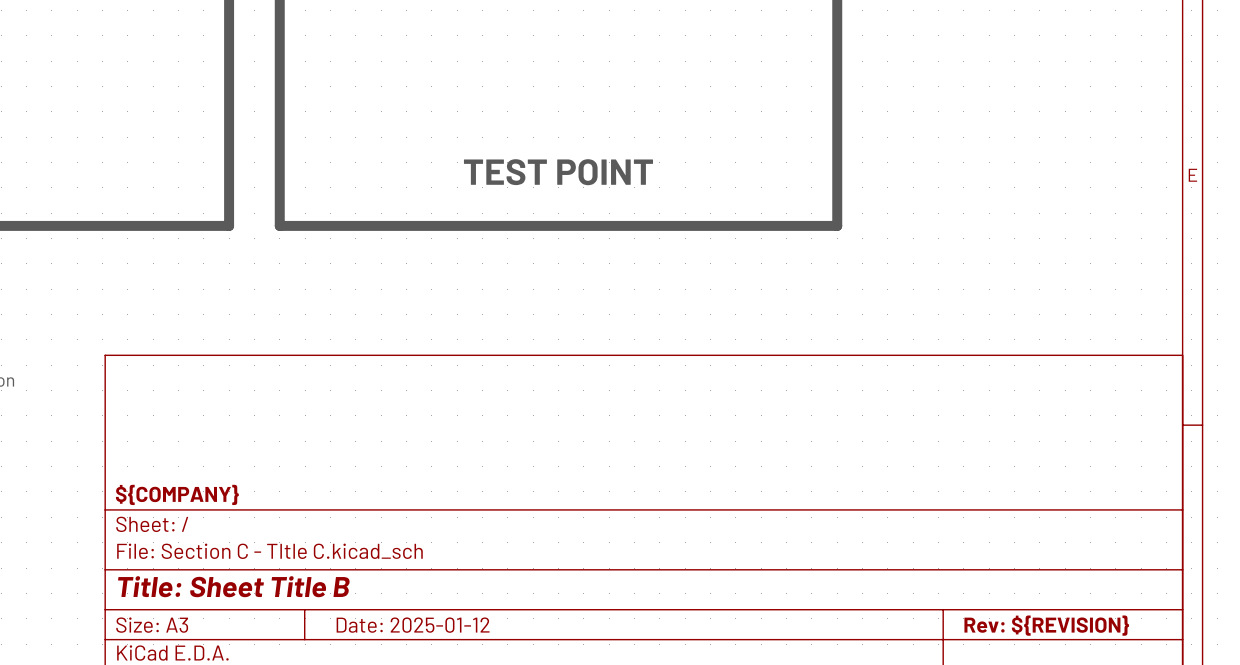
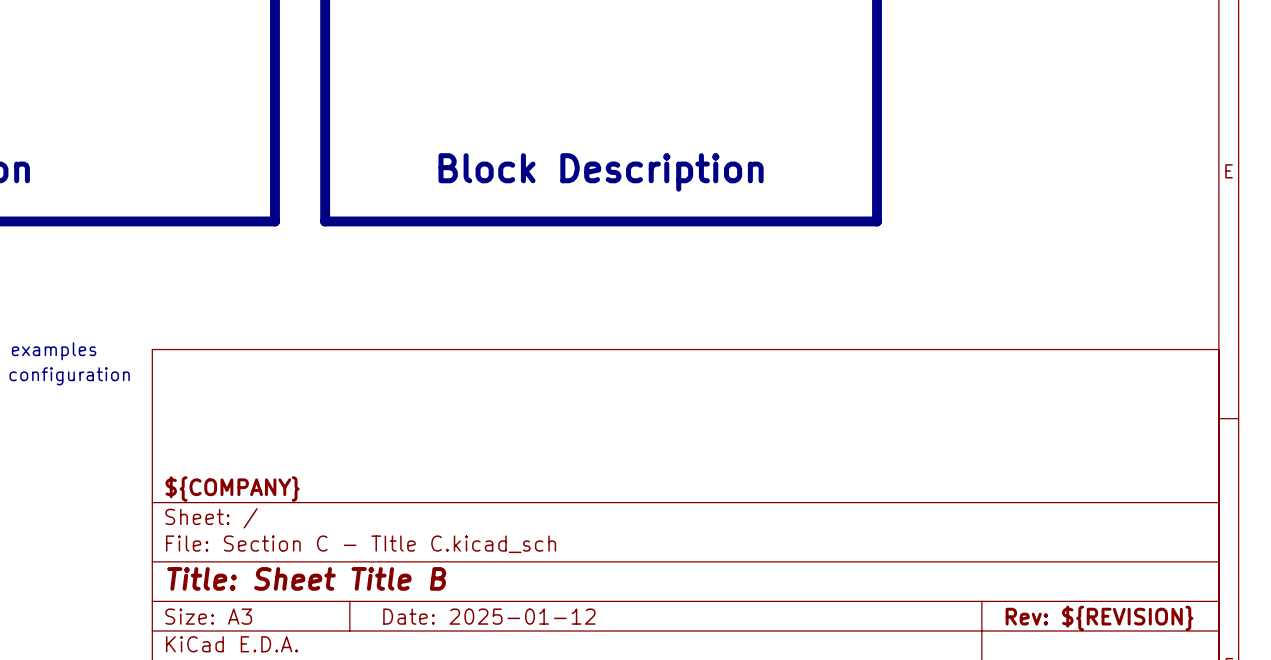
text: TEST POINT (558, 172) -> Block Description (601, 172)

